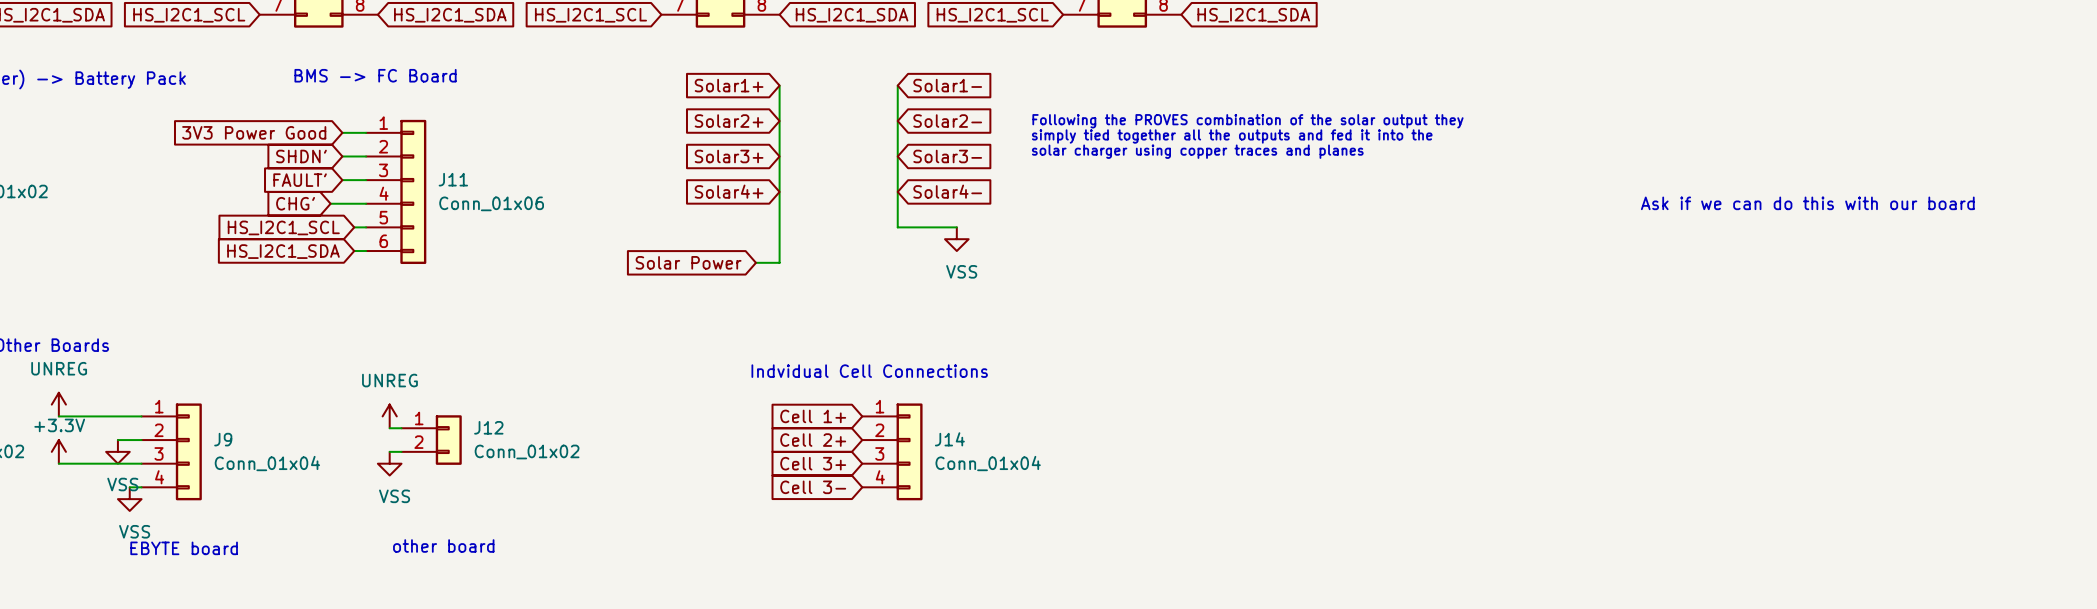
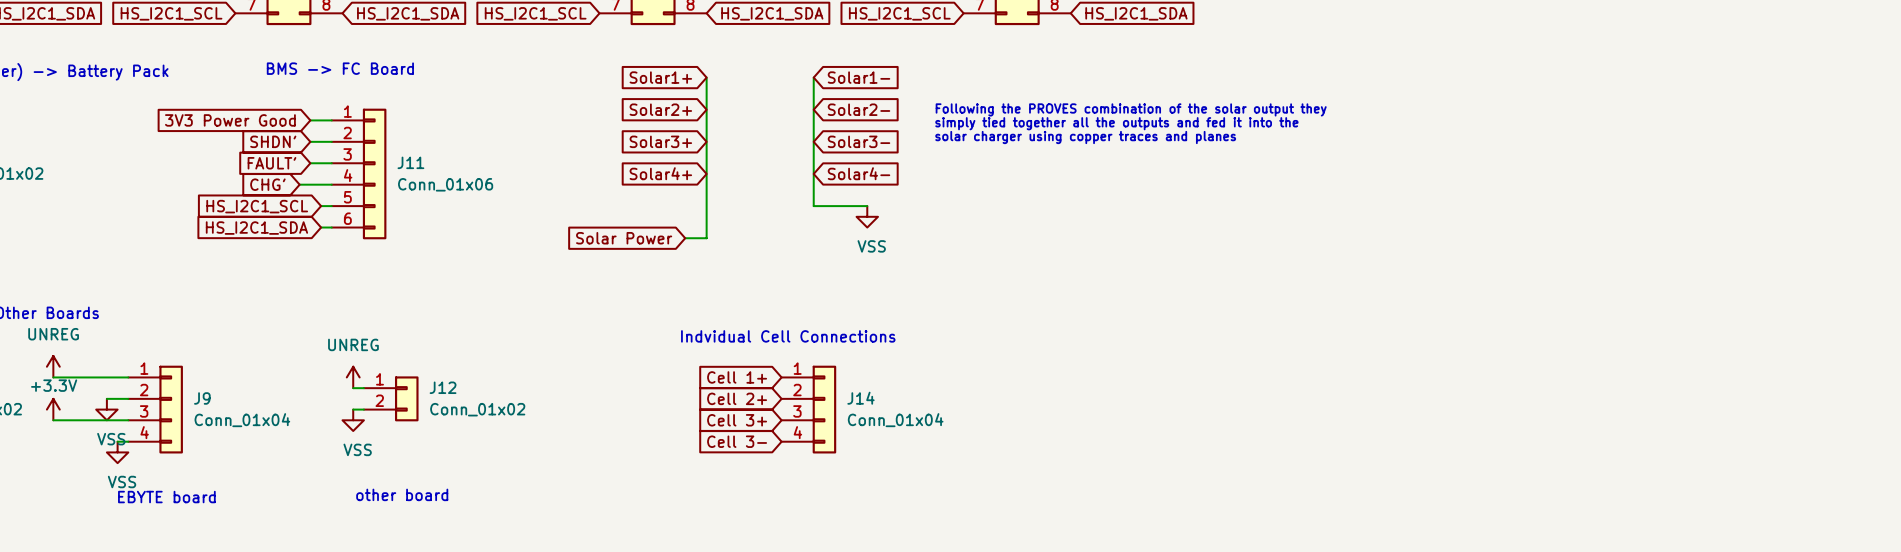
text: Ask if we can do this with our board (1807, 203) -> none

